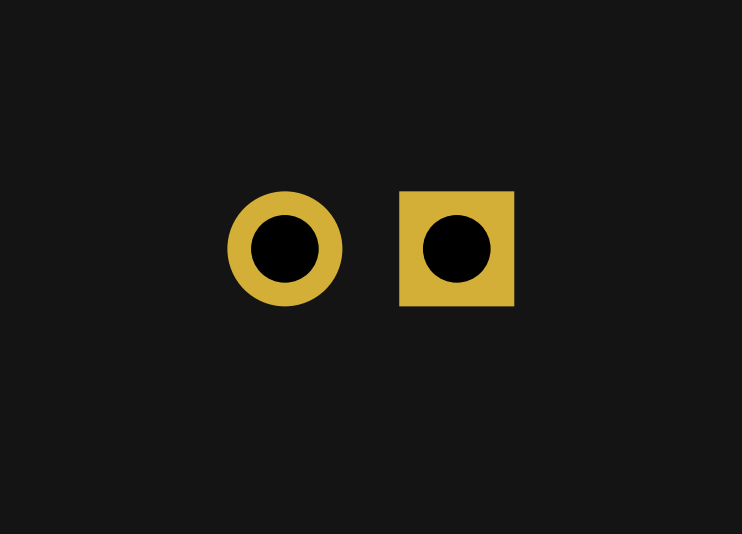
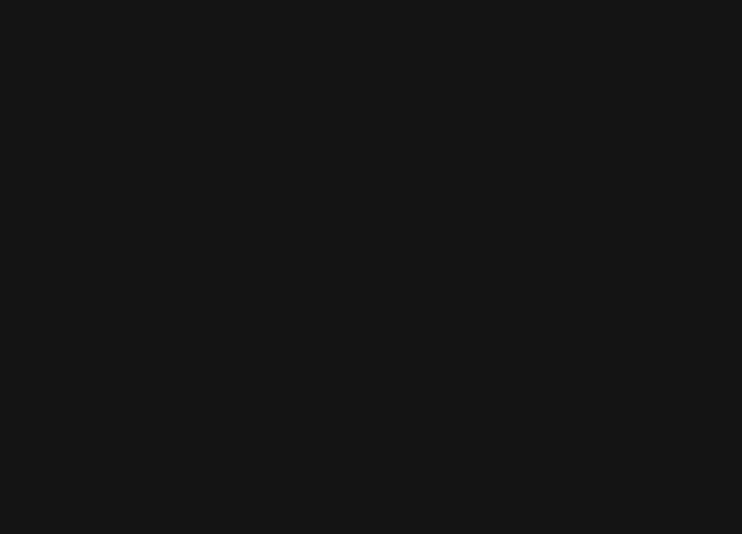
part: (370, 248) -> none

